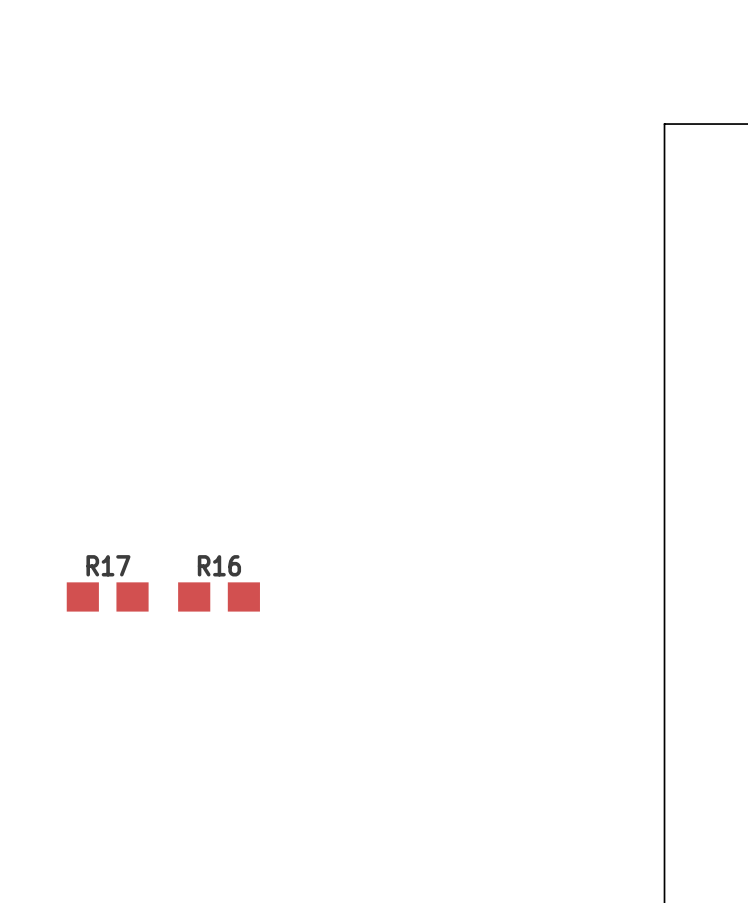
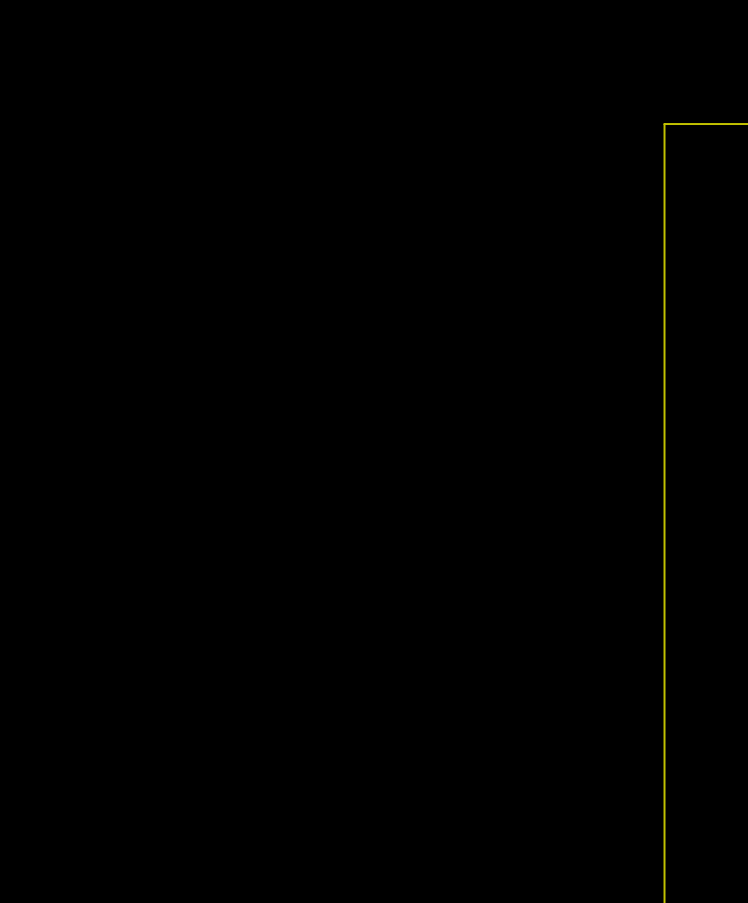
R17: (107, 596) -> none
R16: (219, 596) -> none

